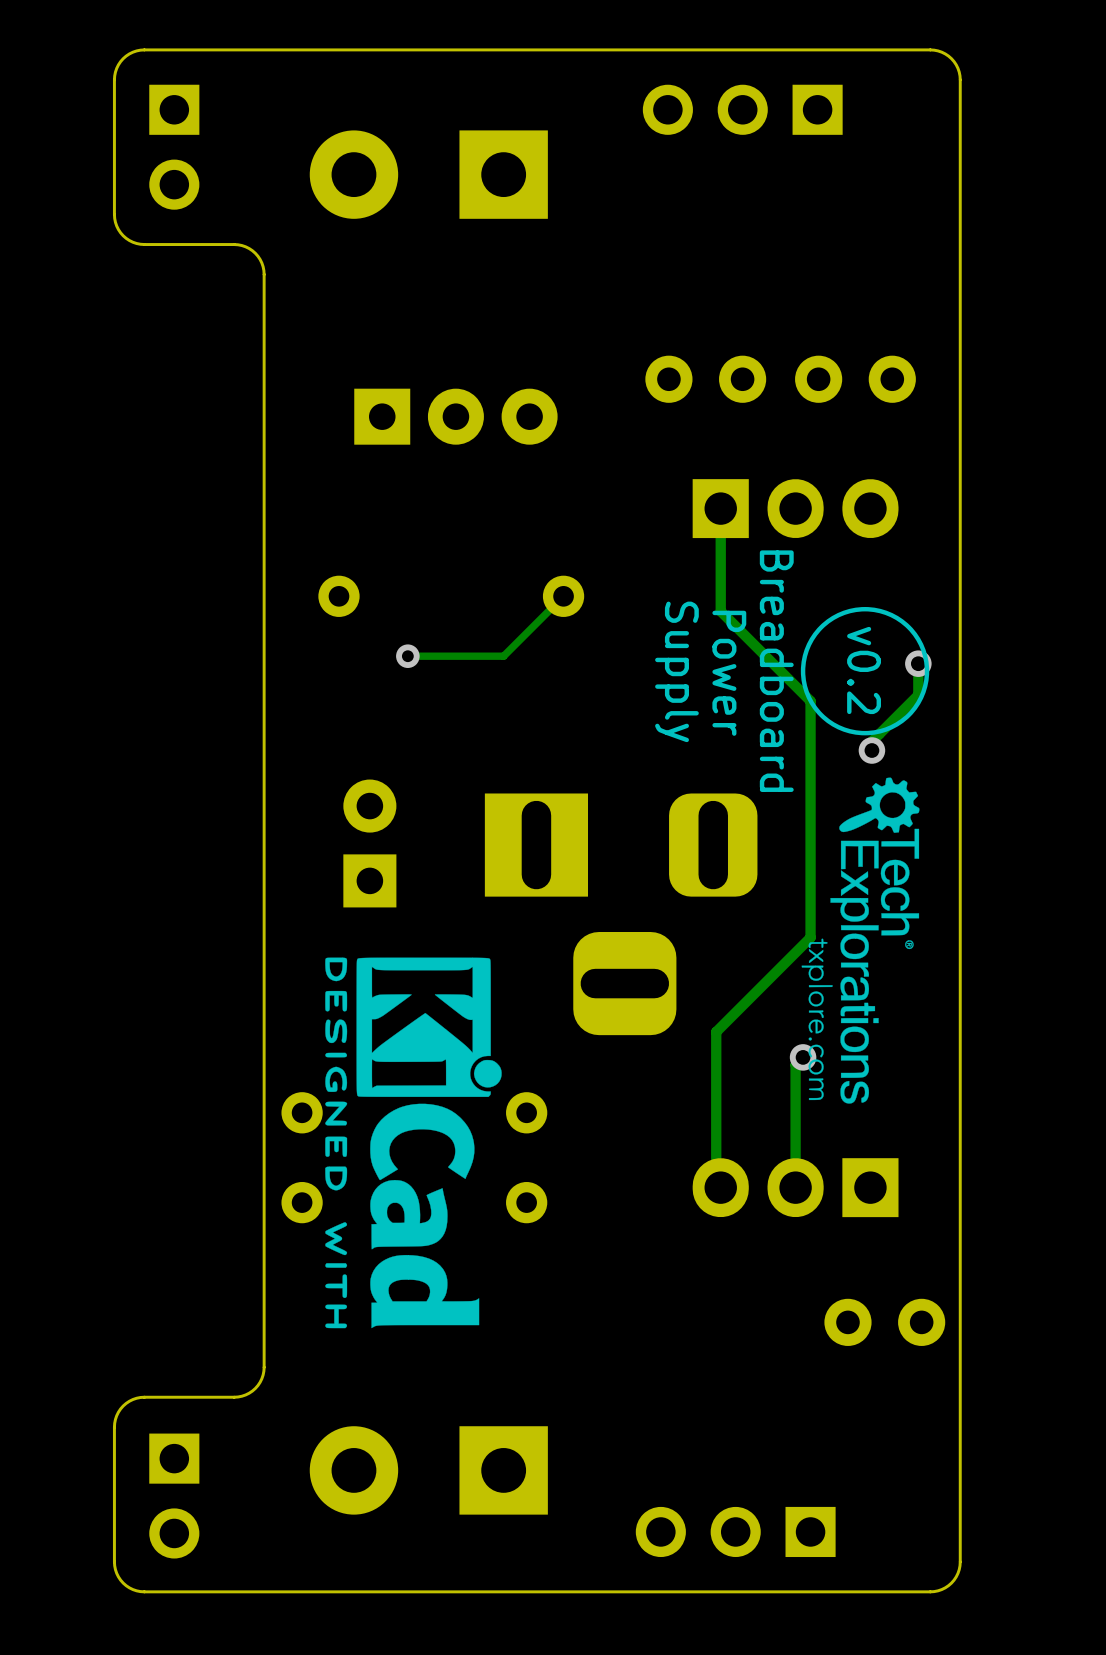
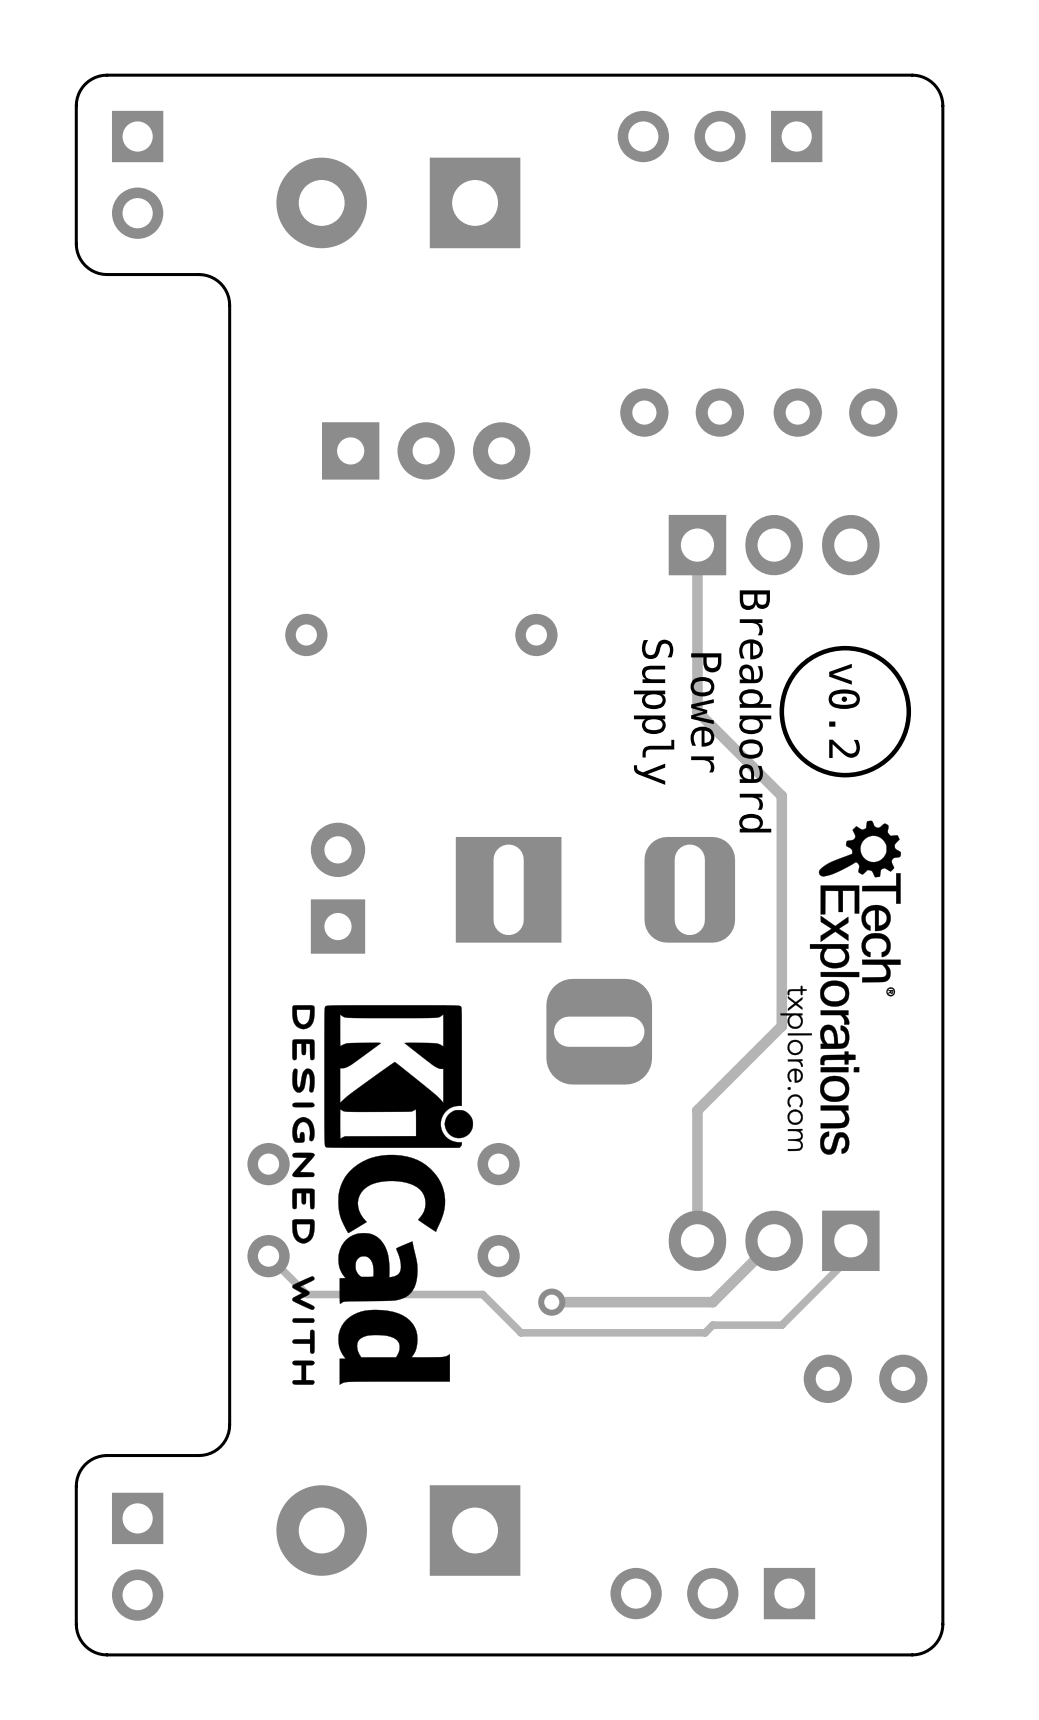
track: (563, 596) (503, 656) (407, 656) -> none
track: (720, 611) (810, 701) (810, 937) (716, 1031) (716, 1180) (720, 1184) -> (697, 650) (697, 711) (781, 796) (781, 1026) (697, 1110) (697, 1237)
via: (407, 656) -> none
track: (918, 663) (918, 695) (871, 741) (871, 750) -> none
via: (918, 663) -> none
via: (871, 750) -> none
track: (803, 1057) (795, 1064) (795, 1187) -> (551, 1302) (712, 1302) (774, 1240)
via: (803, 1057) -> none
track: none -> (850, 1240) (850, 1256) (781, 1325) (712, 1325) (705, 1332) (521, 1332) (482, 1294) (306, 1294) (268, 1256)
via: none -> (551, 1302)

